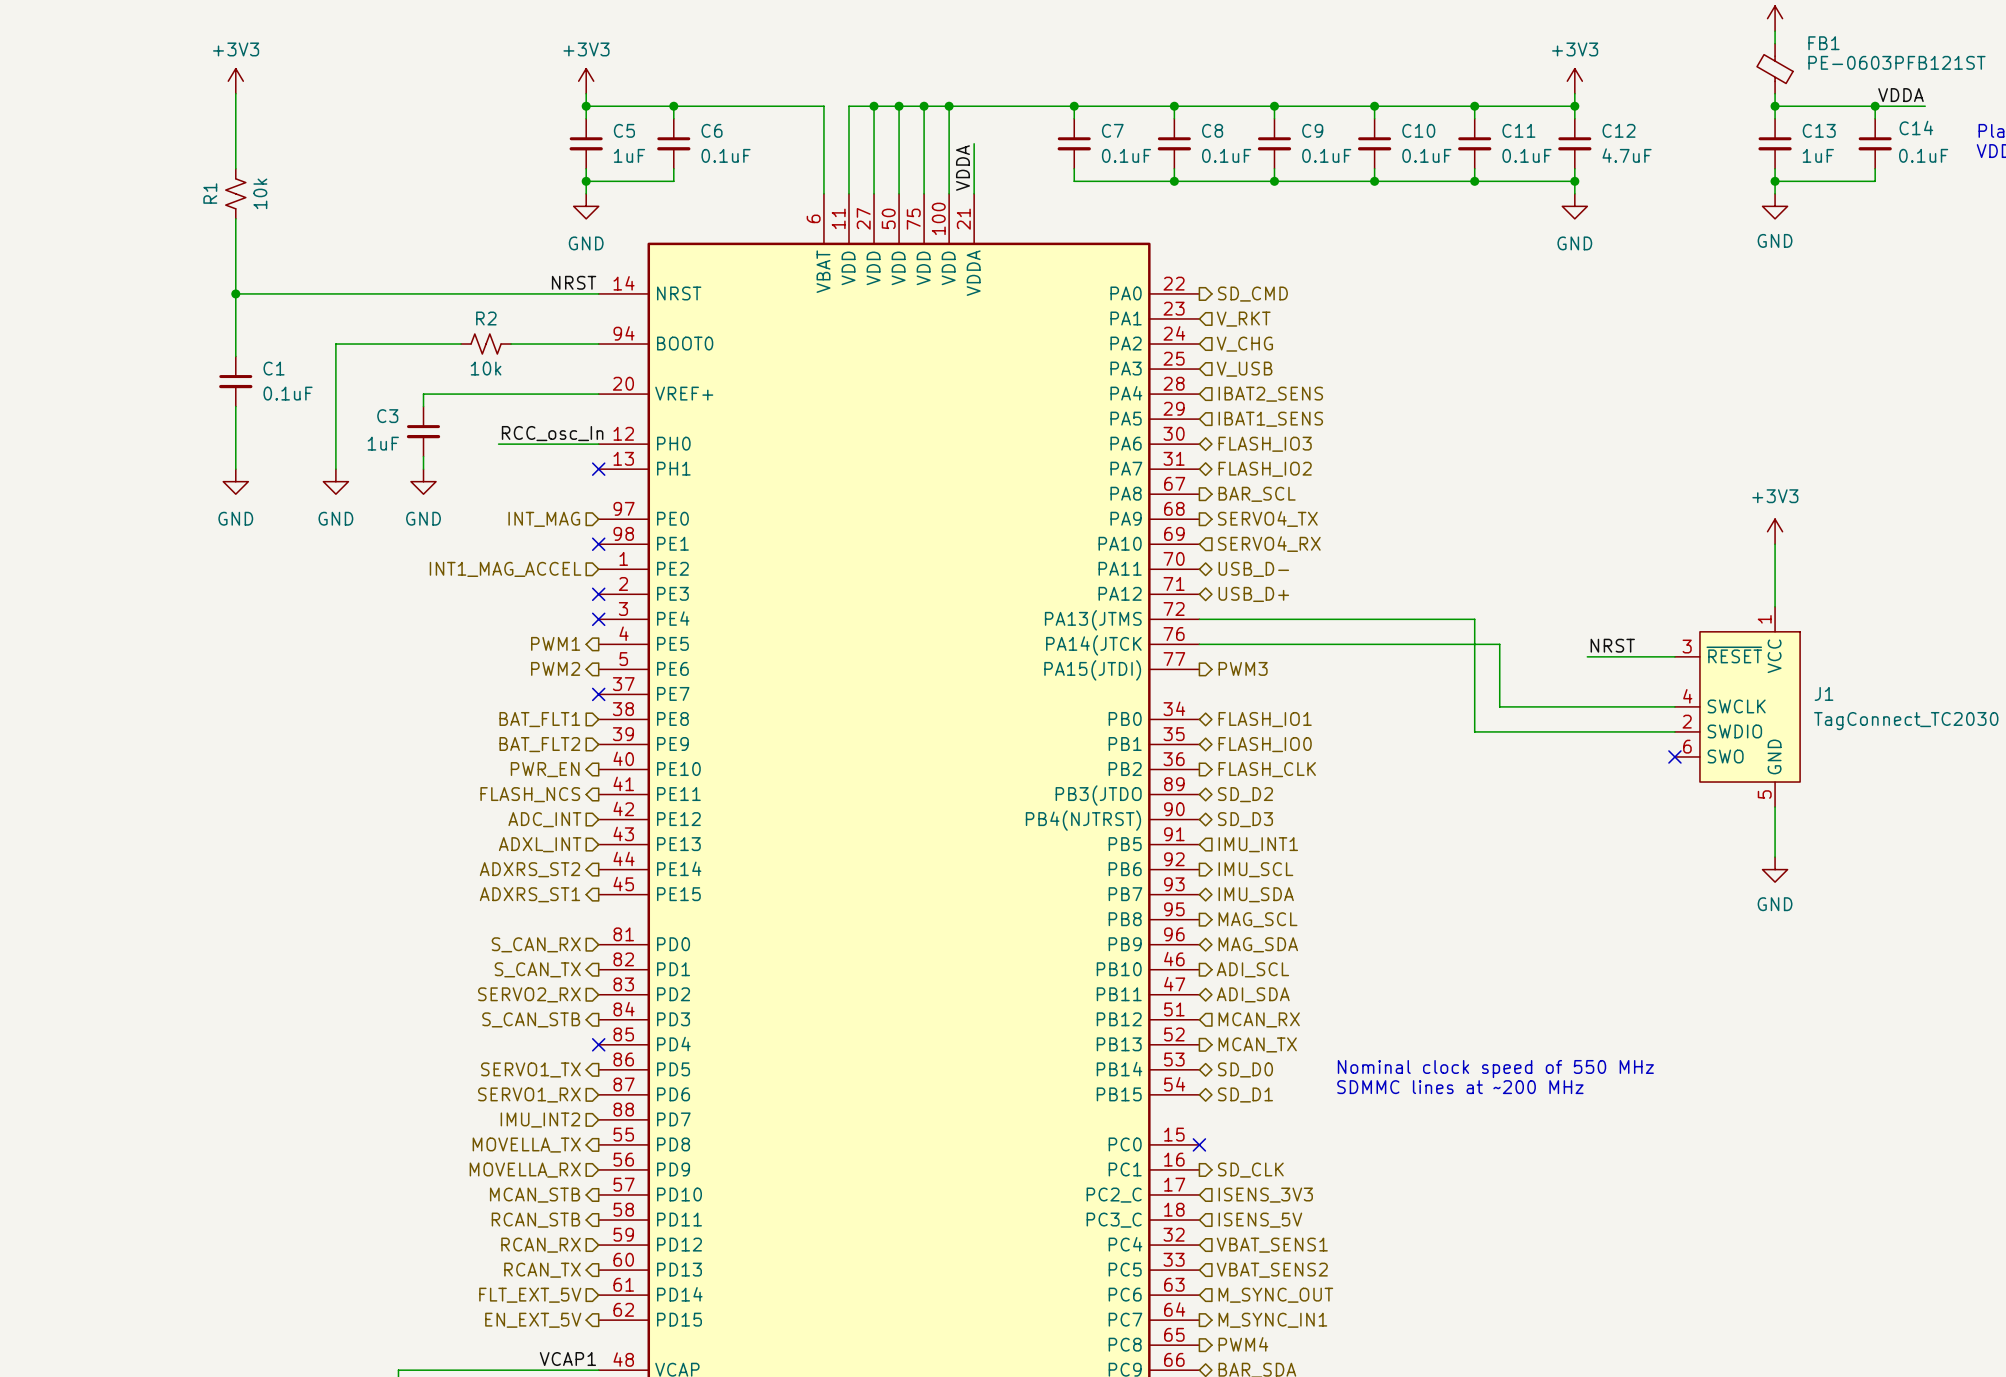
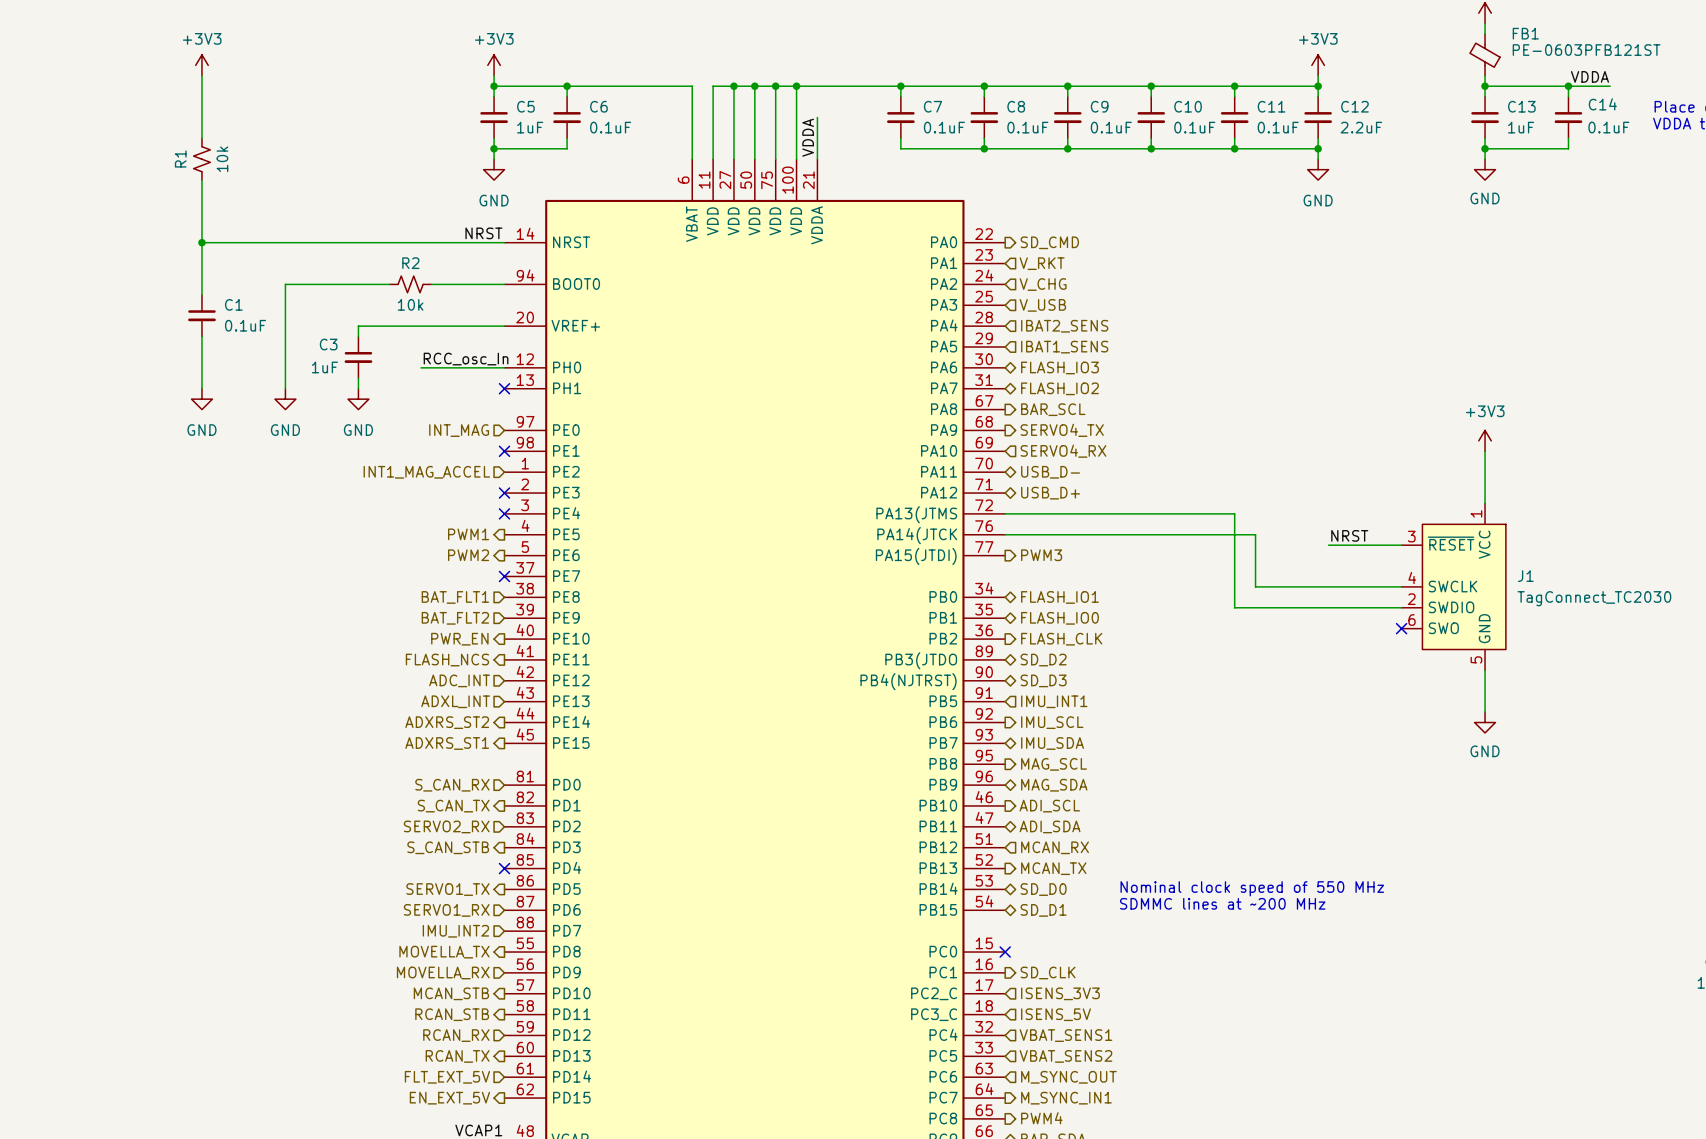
C12 value: 4.7uF (1627, 155) -> 2.2uF (1361, 127)

